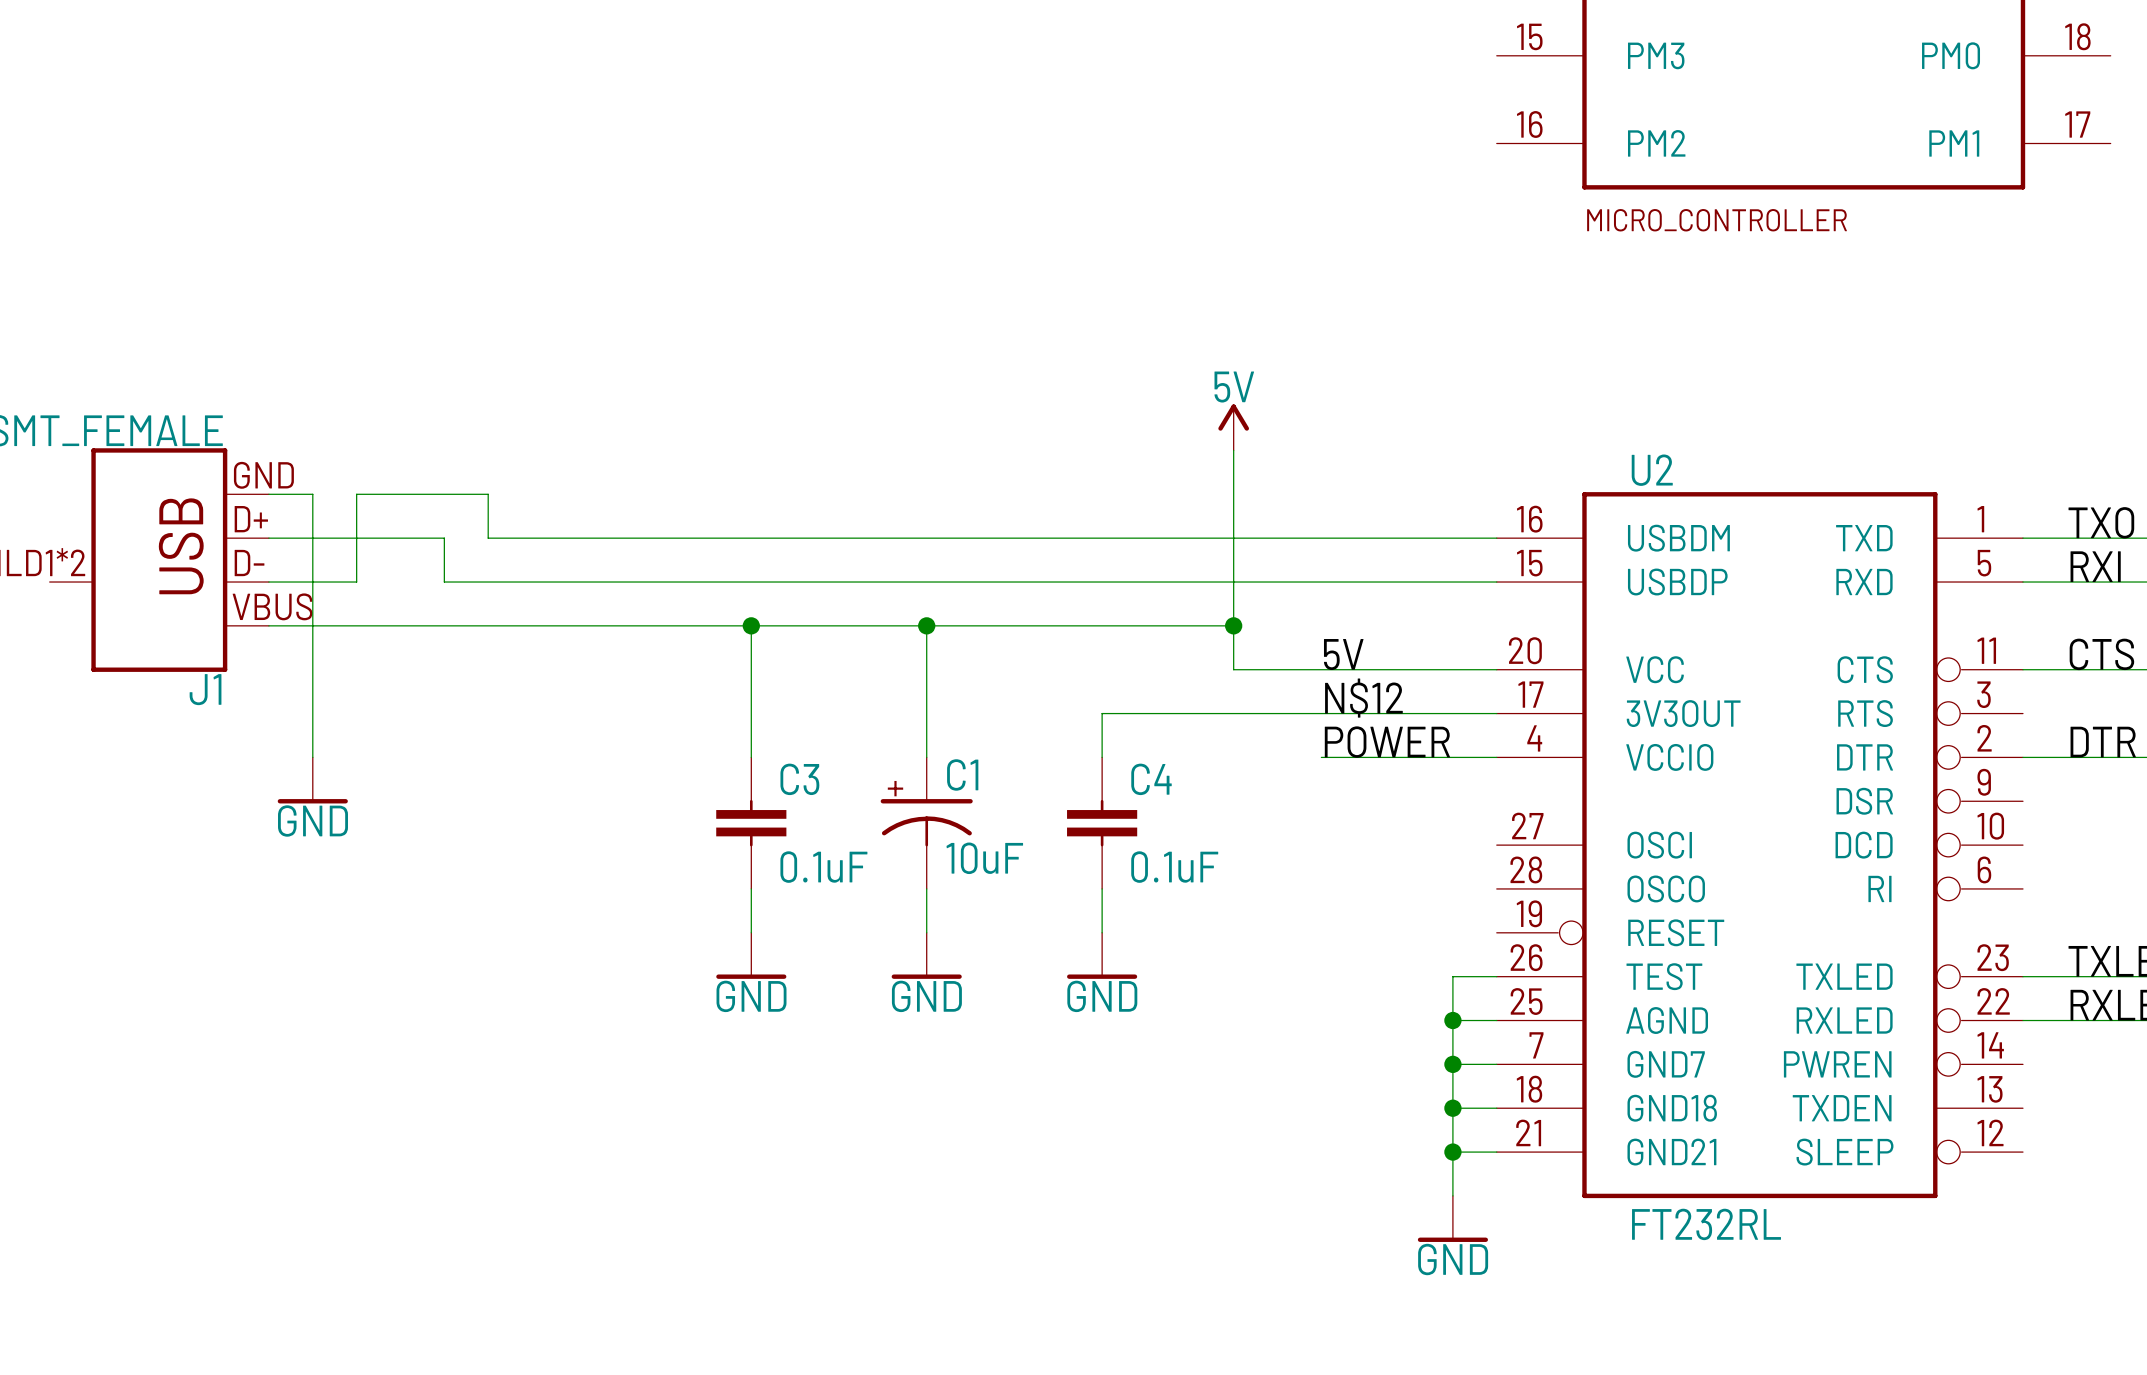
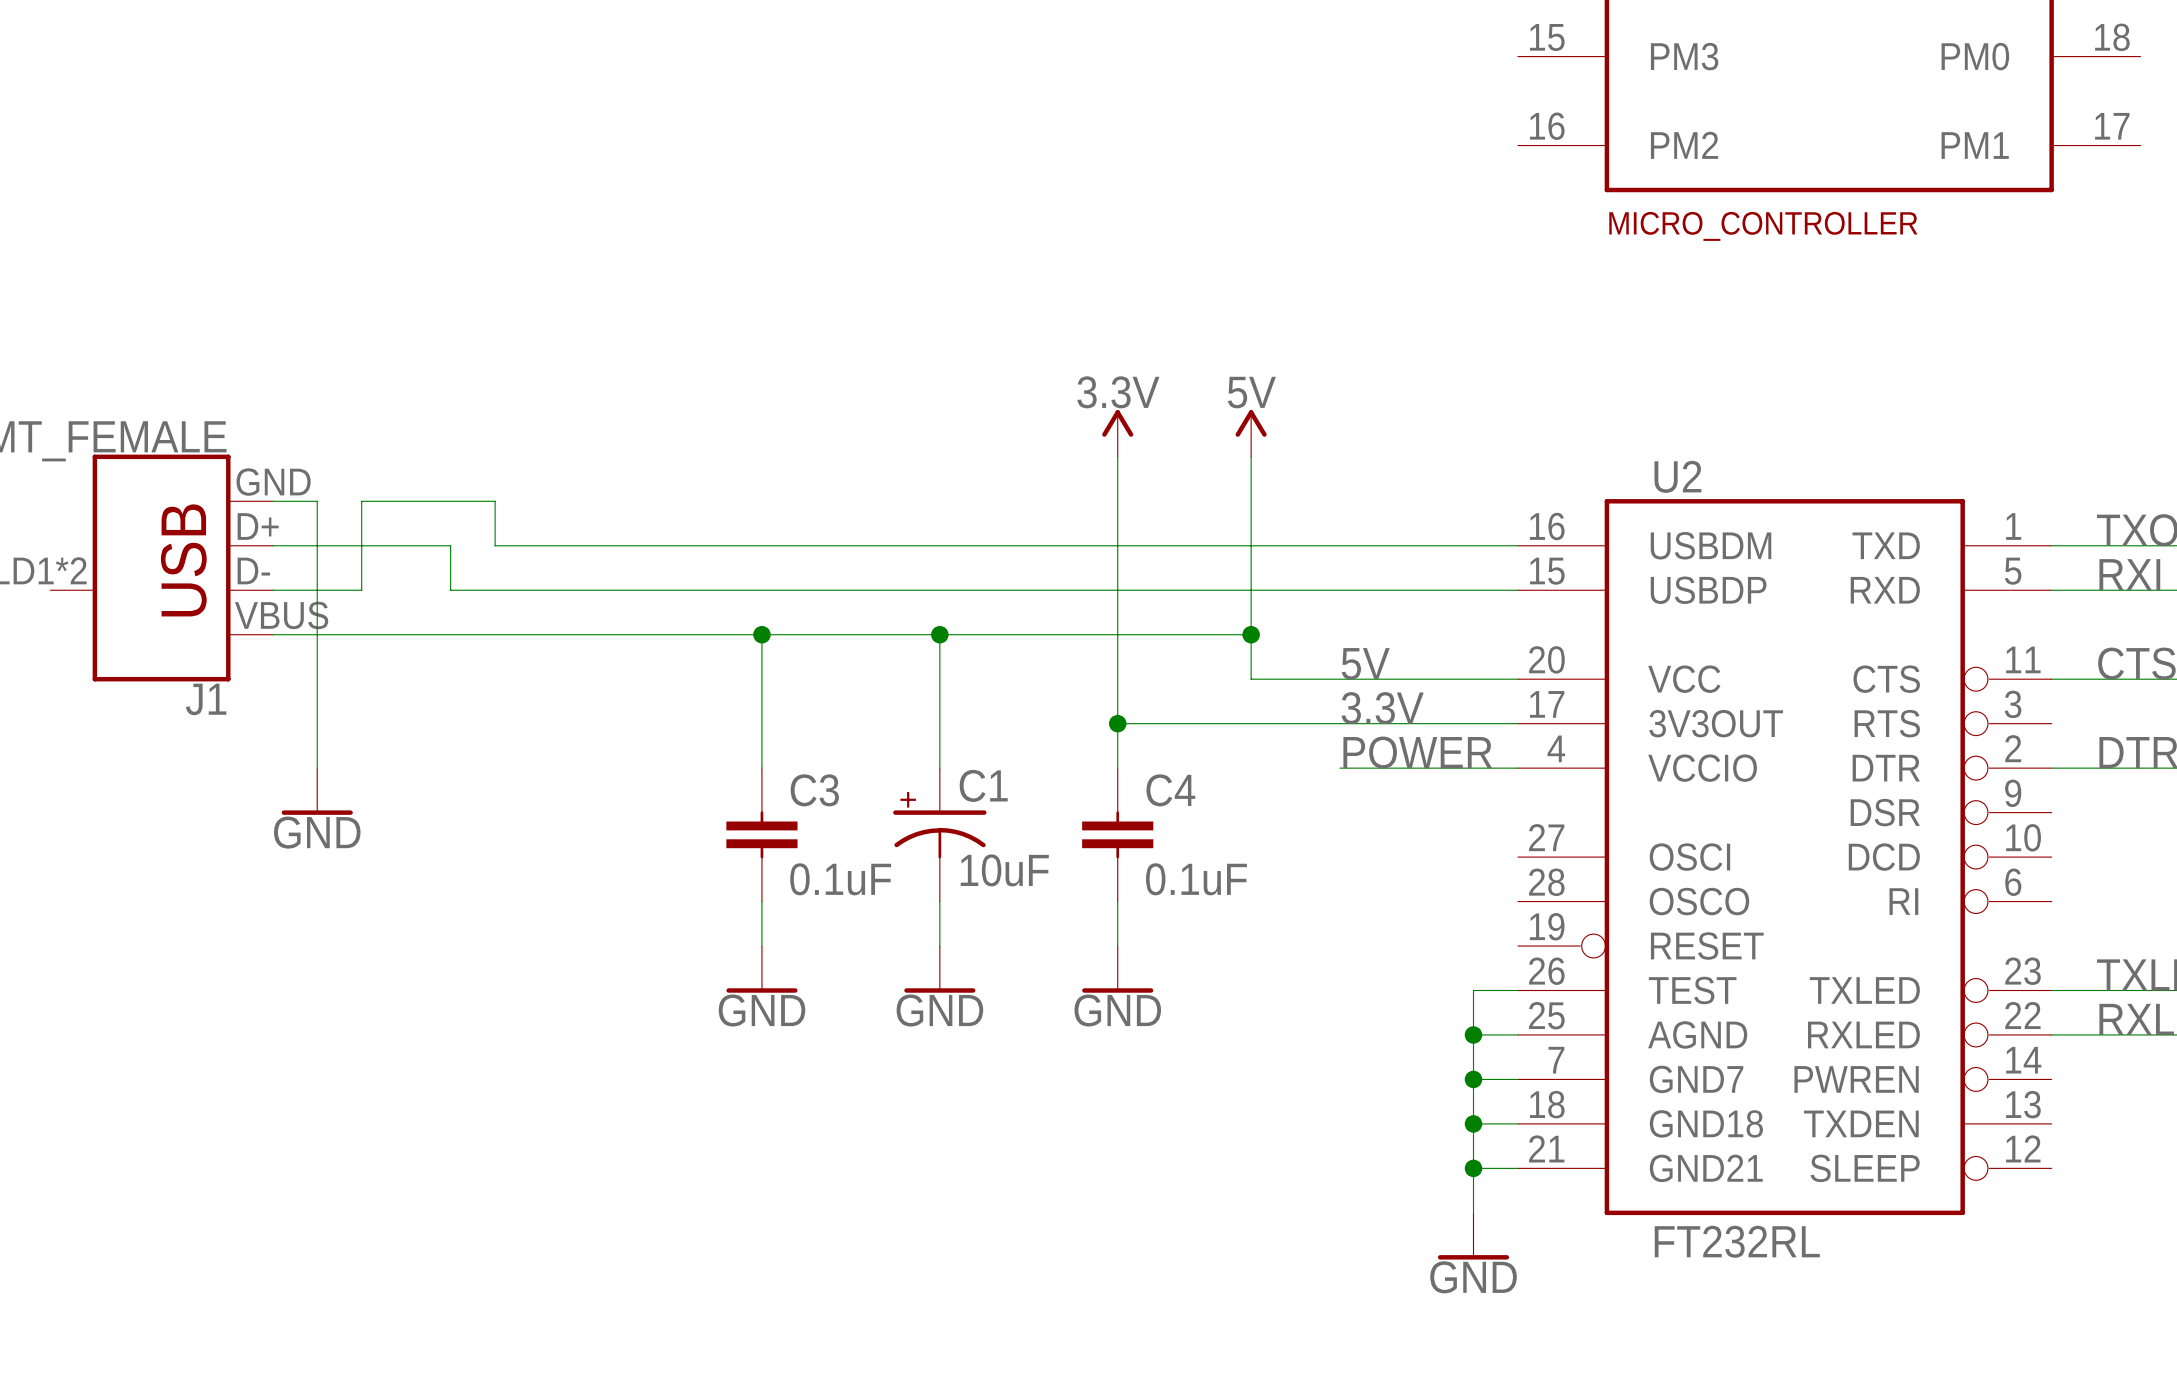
power symbol: none -> 3.3V (1117, 433)
wire: none -> (1117, 456) (1117, 723)
label: N$12 (1363, 698) -> 3.3V (1382, 708)
junction: none -> (1117, 723)

